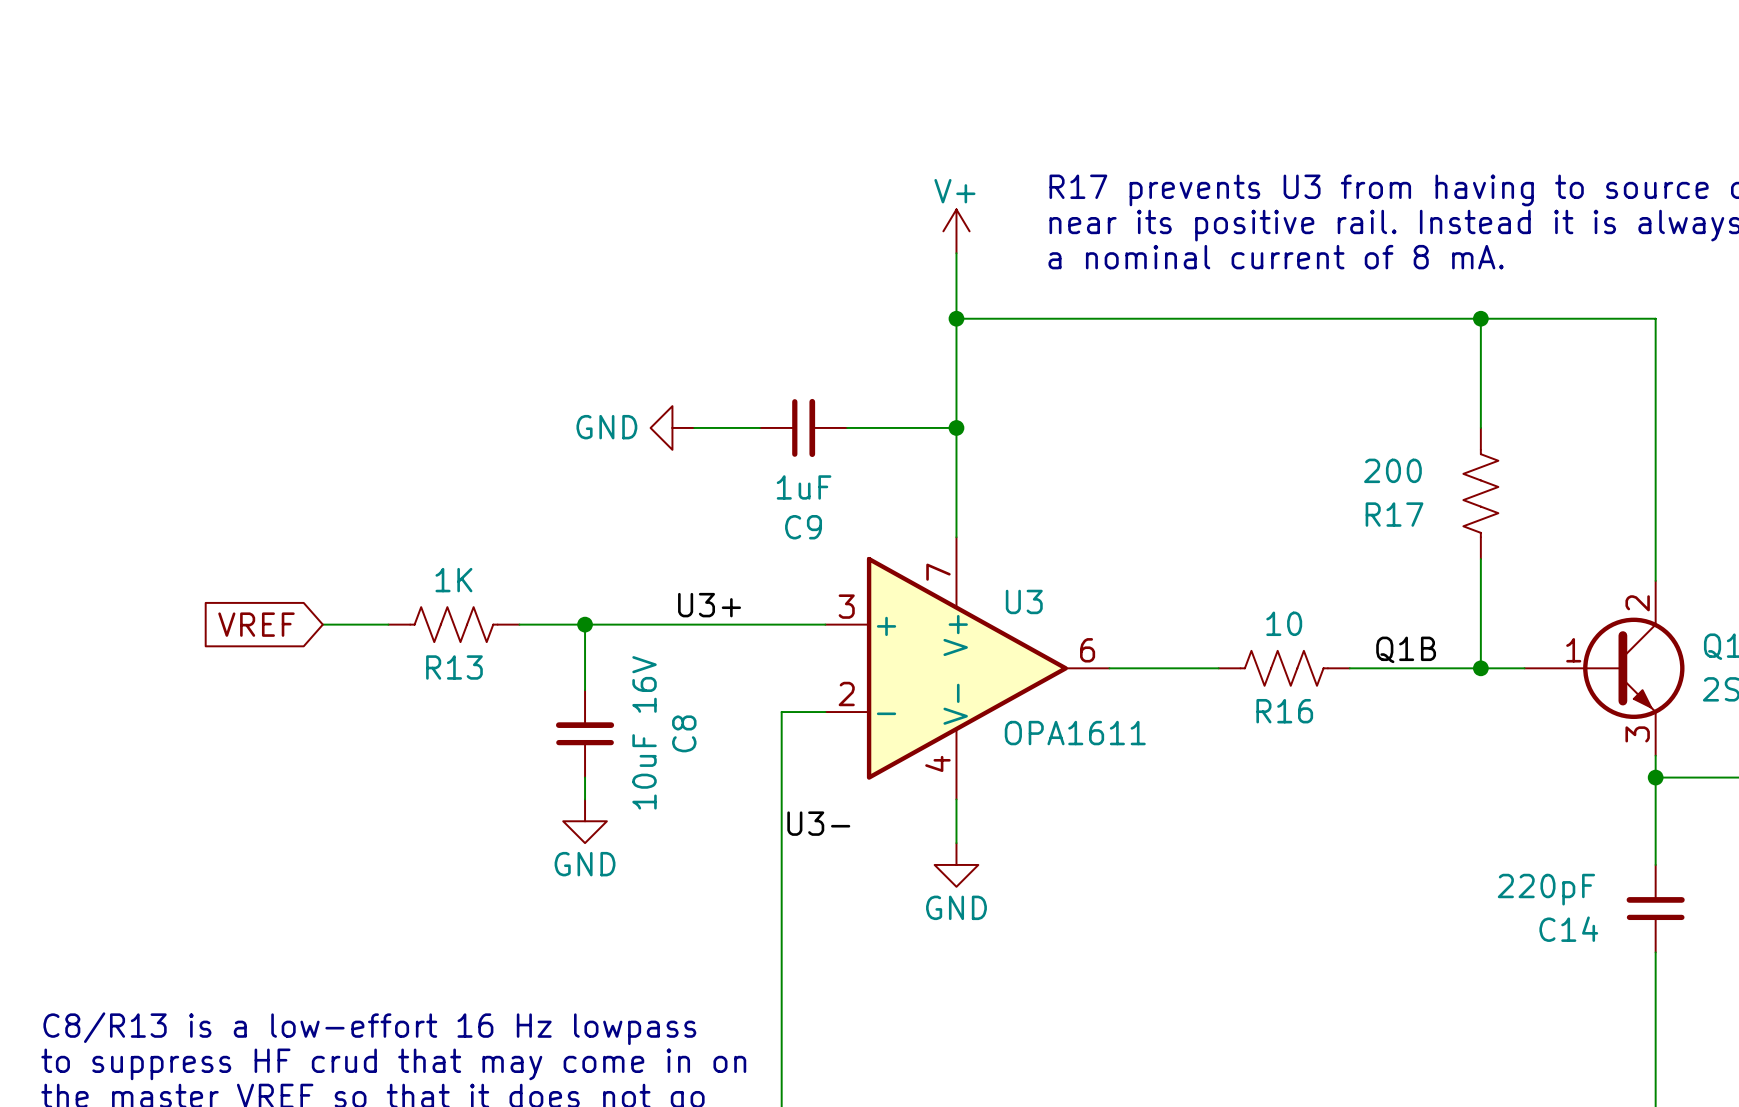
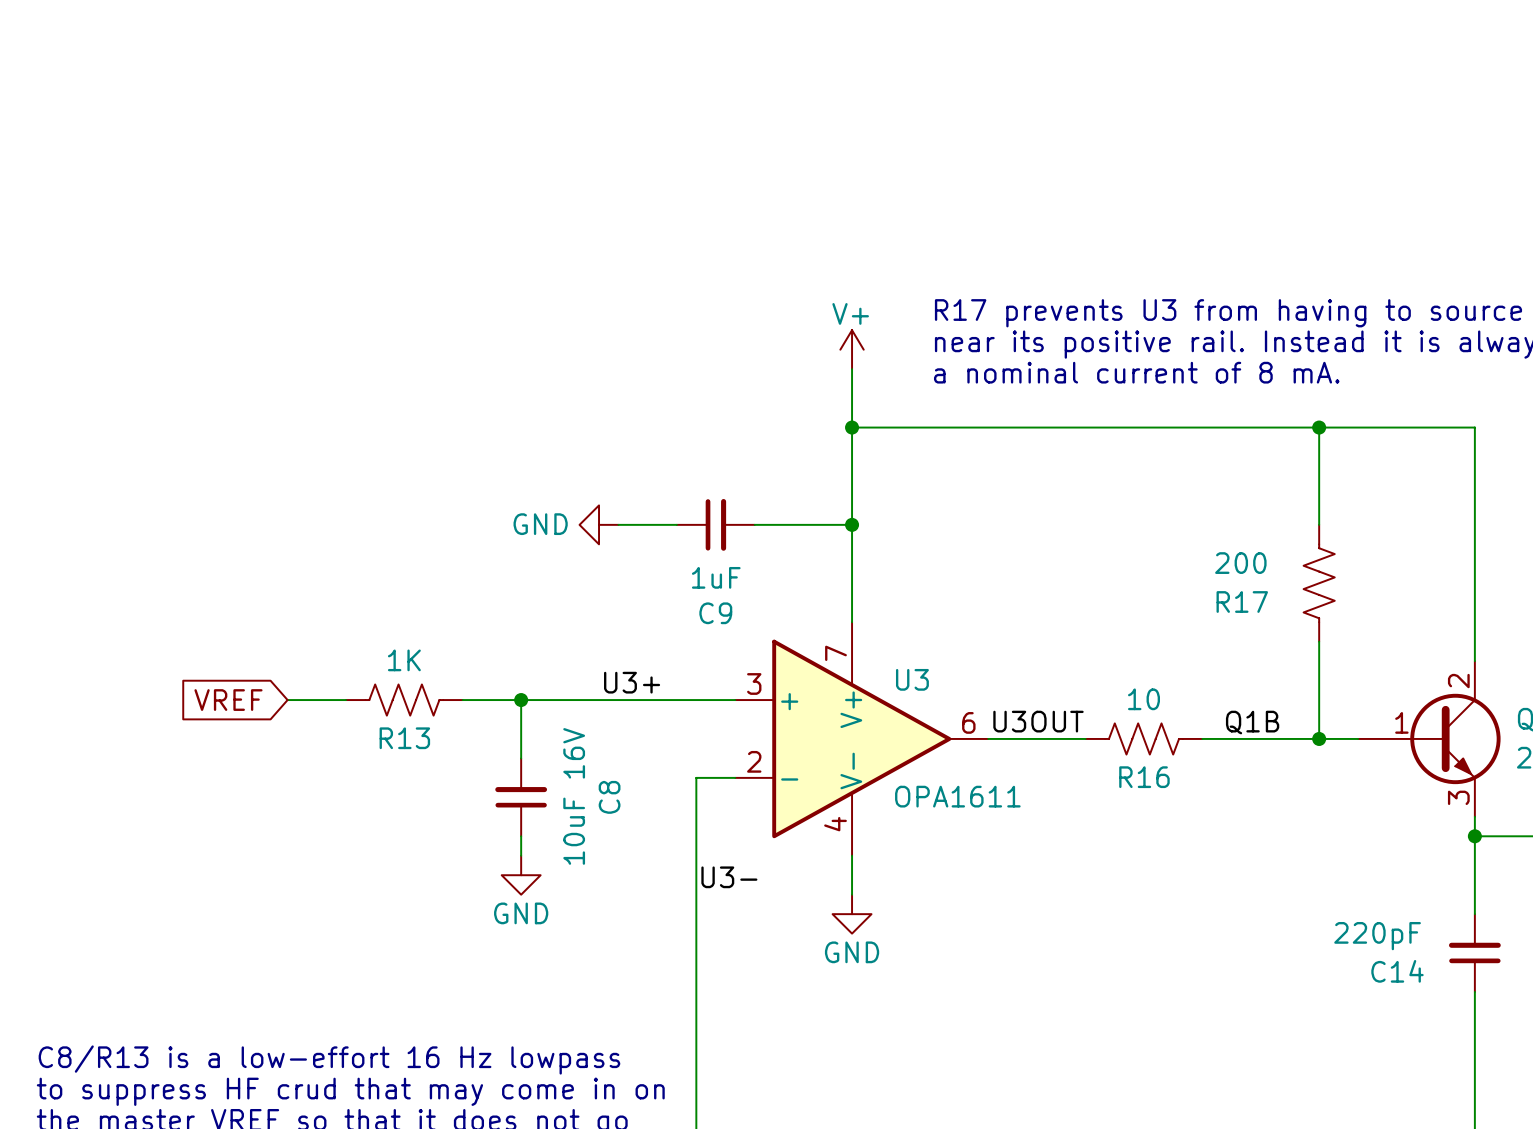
label: none -> U3OUT (1038, 721)

